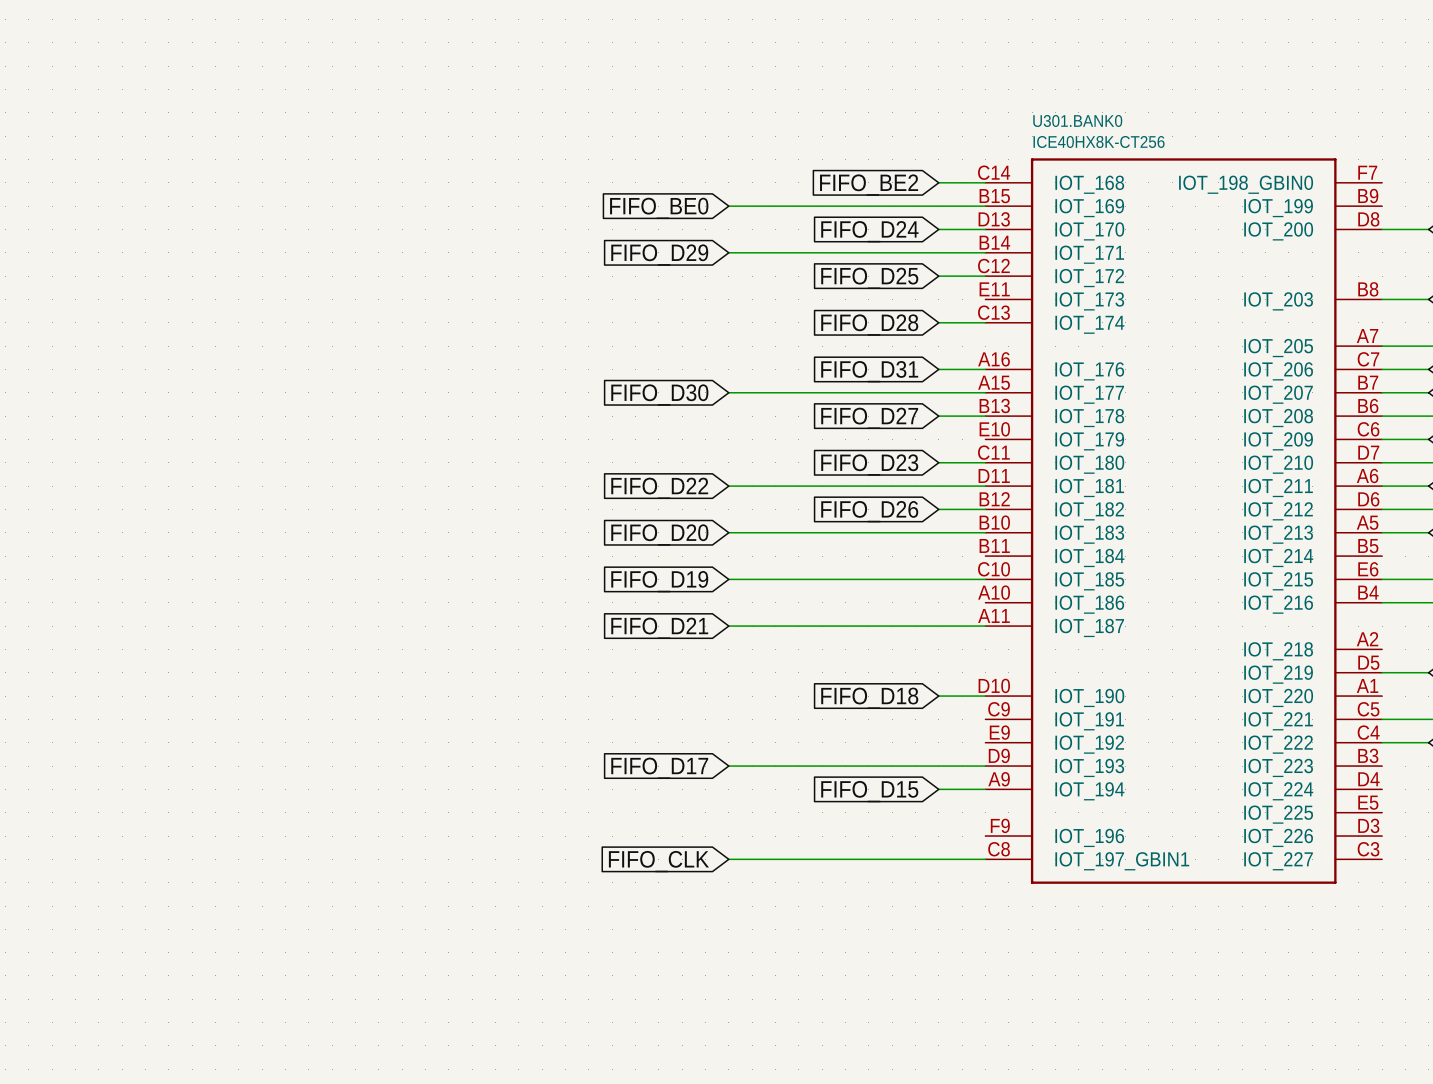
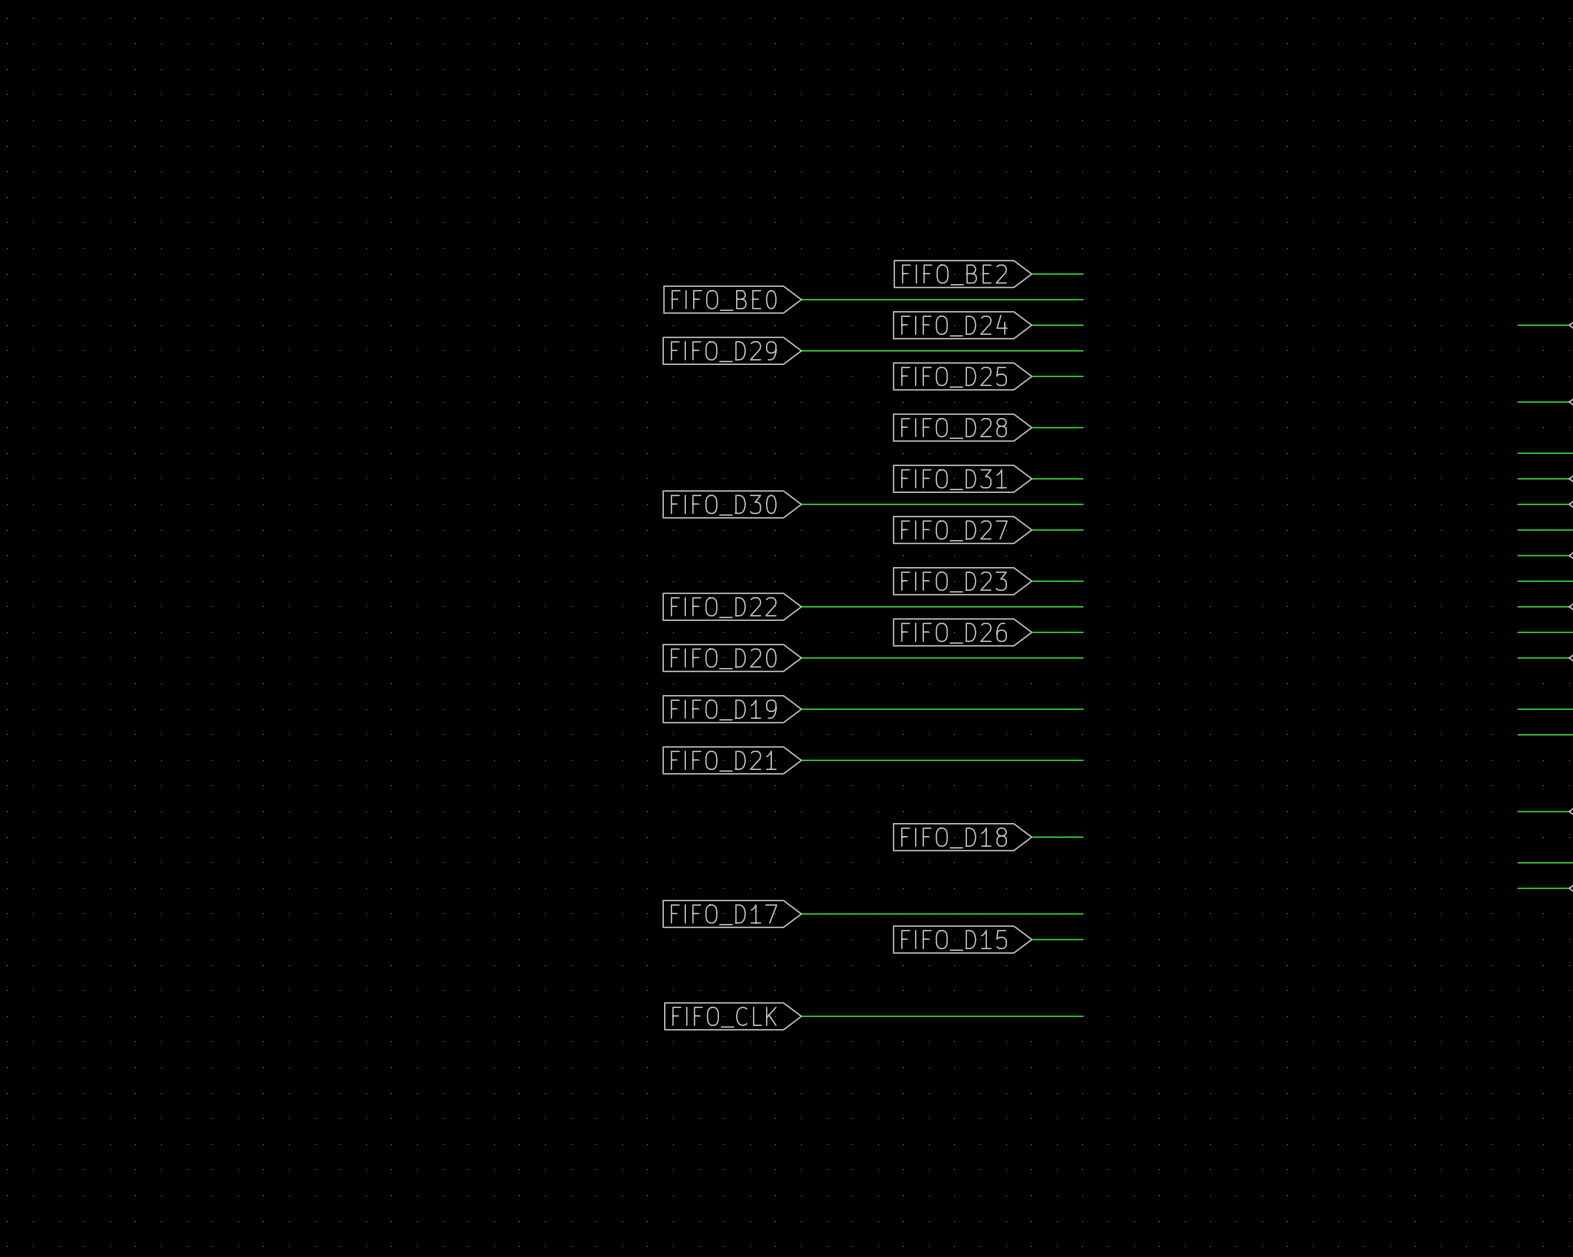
U301.BANK0: ICE40HX8K-CT256 (1183, 521) -> none

